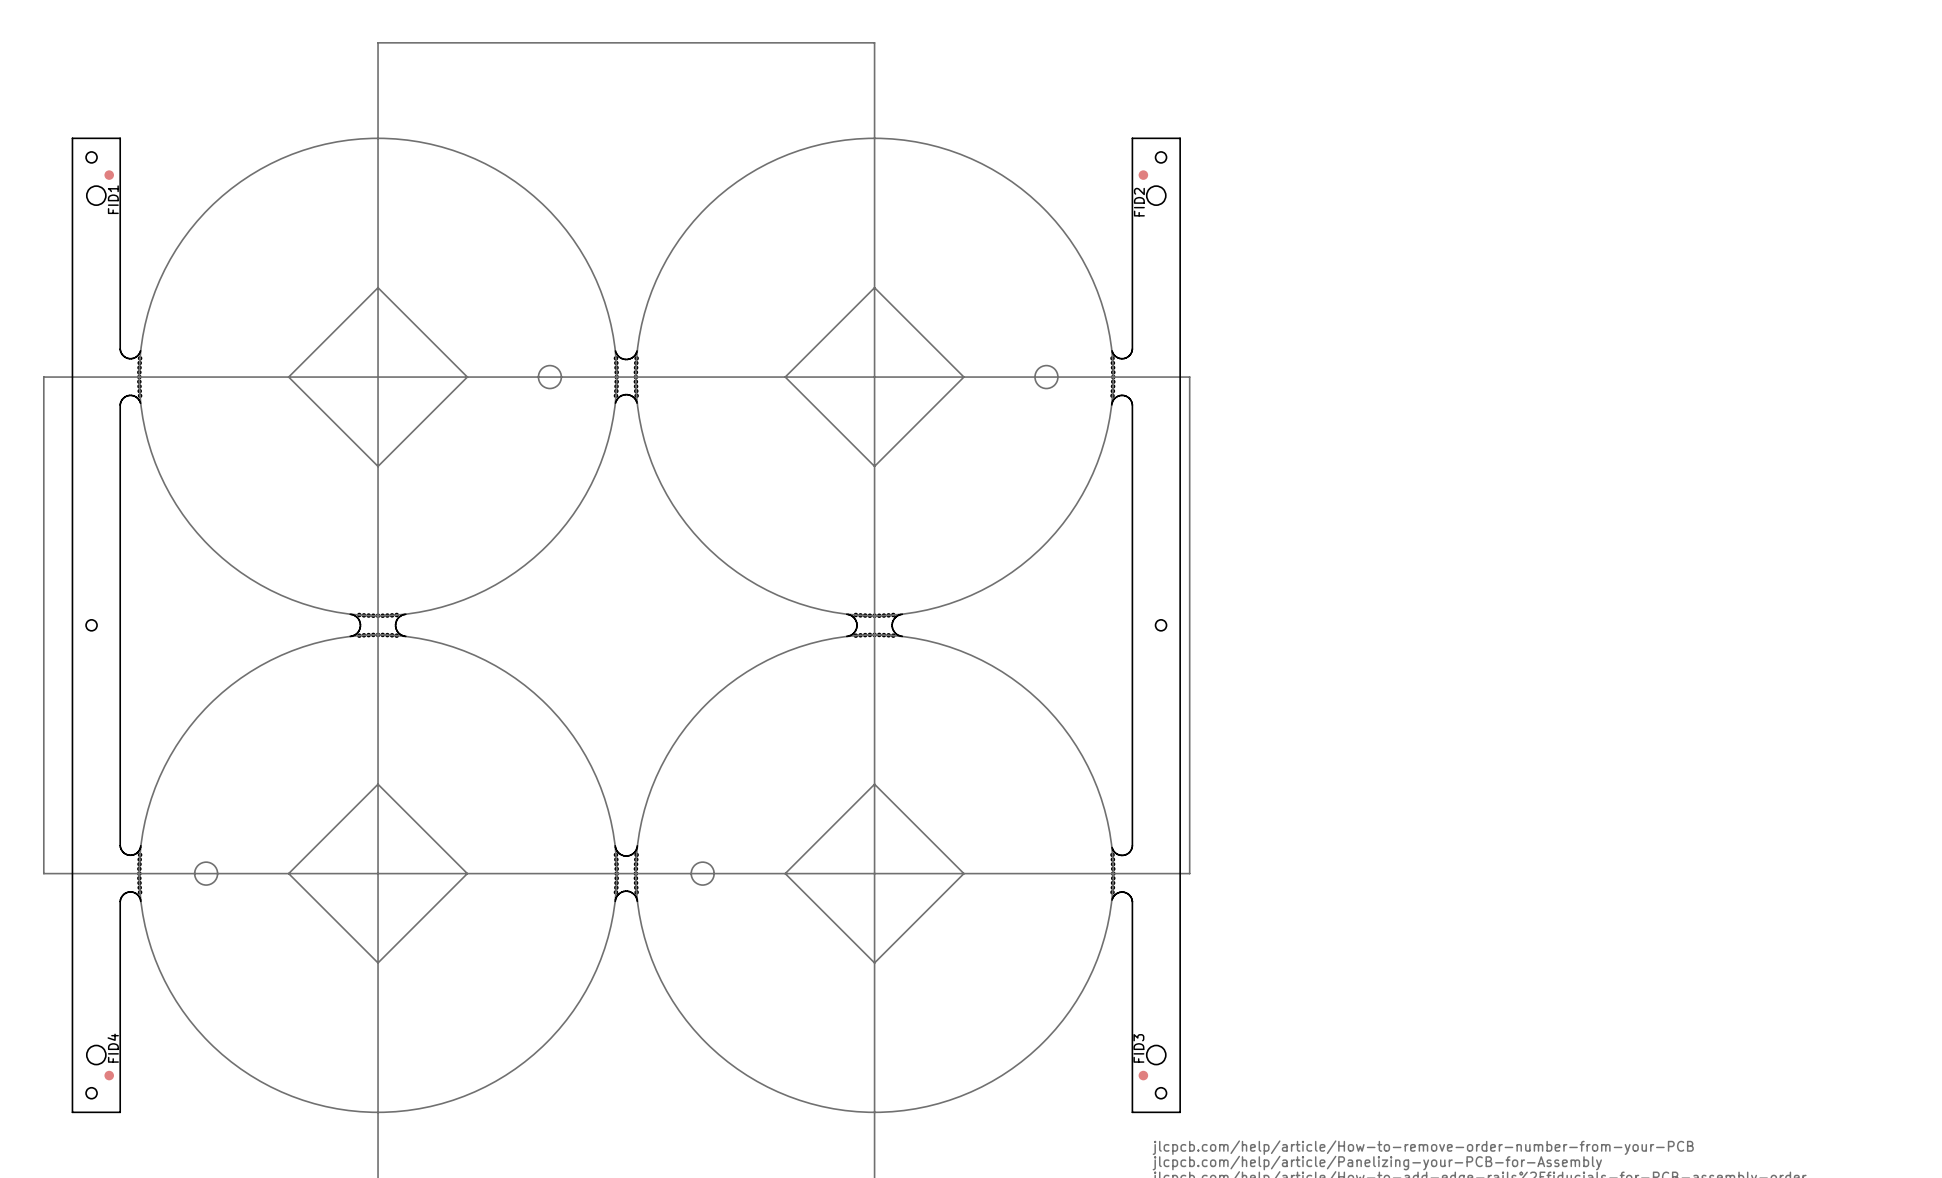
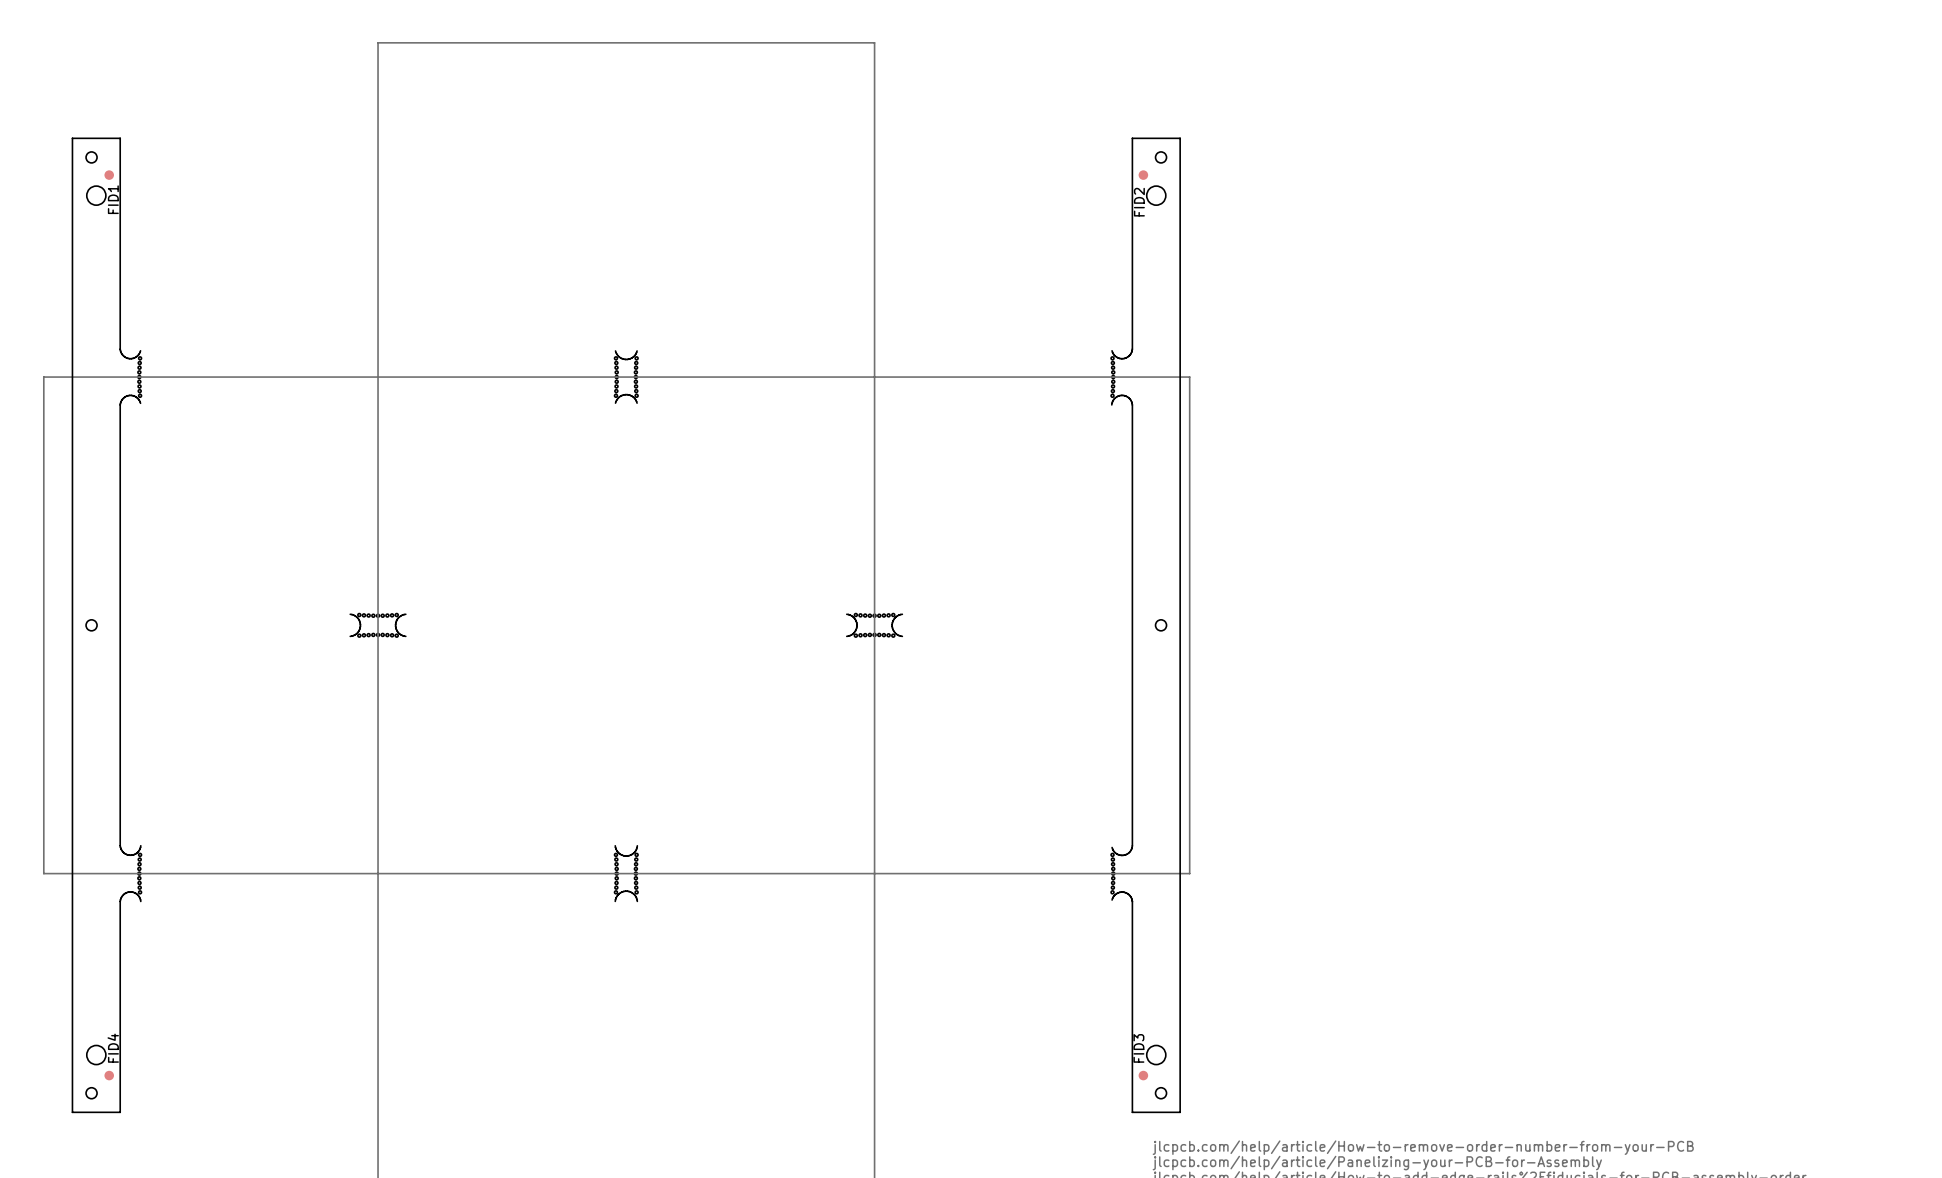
drawing: [139, 138, 617, 616] -> none
drawing: [635, 138, 1114, 616] -> none
line: (378, 287) (467, 377) (378, 466) (288, 377) (378, 287) -> none
line: (874, 287) (785, 377) (874, 466) (963, 377) (874, 287) -> none
drawing: [139, 634, 617, 1113] -> none
drawing: [635, 634, 1114, 1113] -> none
line: (378, 784) (288, 873) (378, 962) (467, 873) (378, 784) -> none
line: (874, 784) (963, 873) (874, 962) (785, 873) (874, 784) -> none

